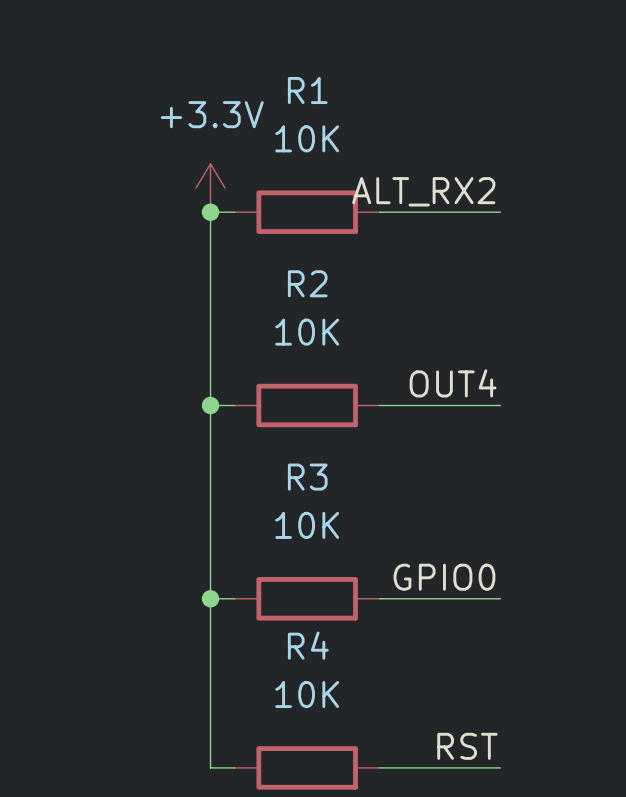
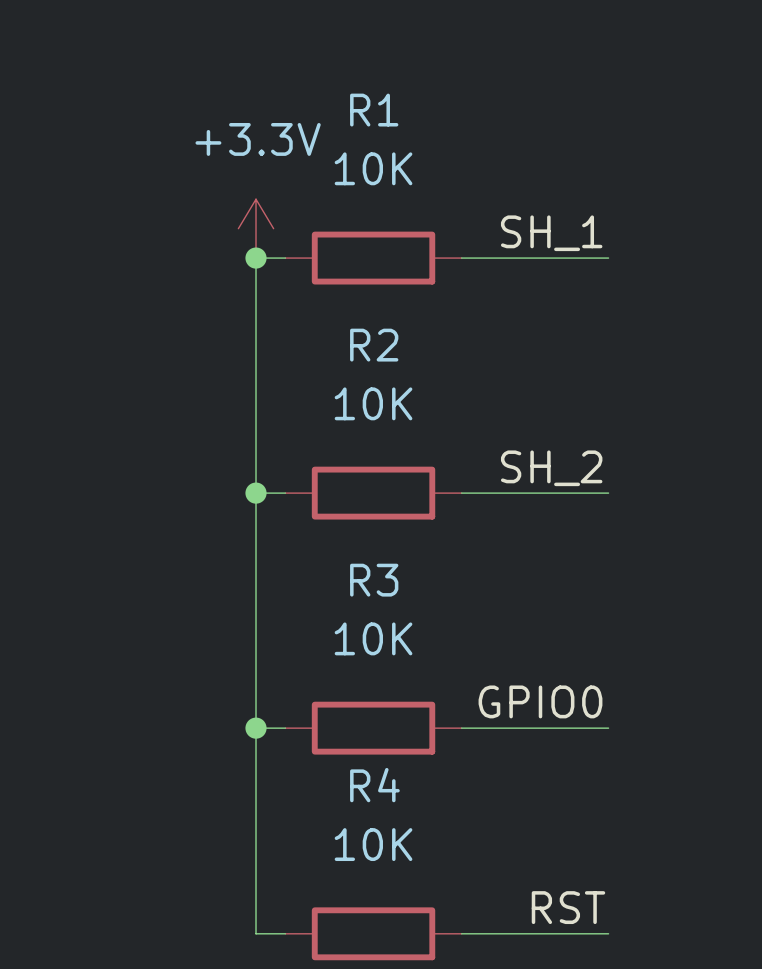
label: ALT_RX2 (423, 191) -> SH_1 (551, 233)
label: OUT4 (453, 383) -> SH_2 (551, 468)

